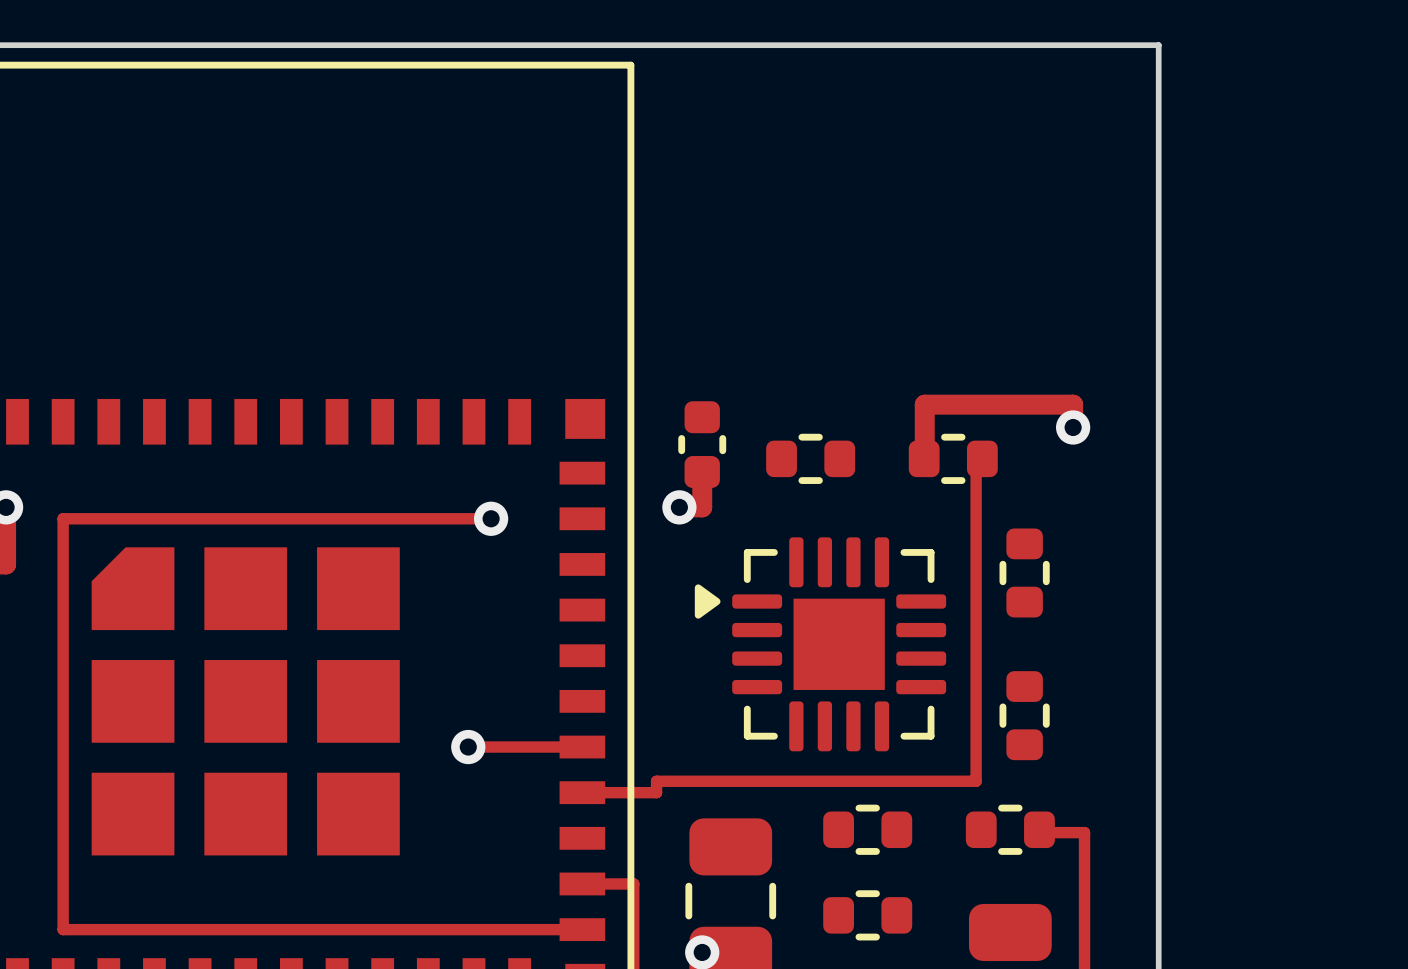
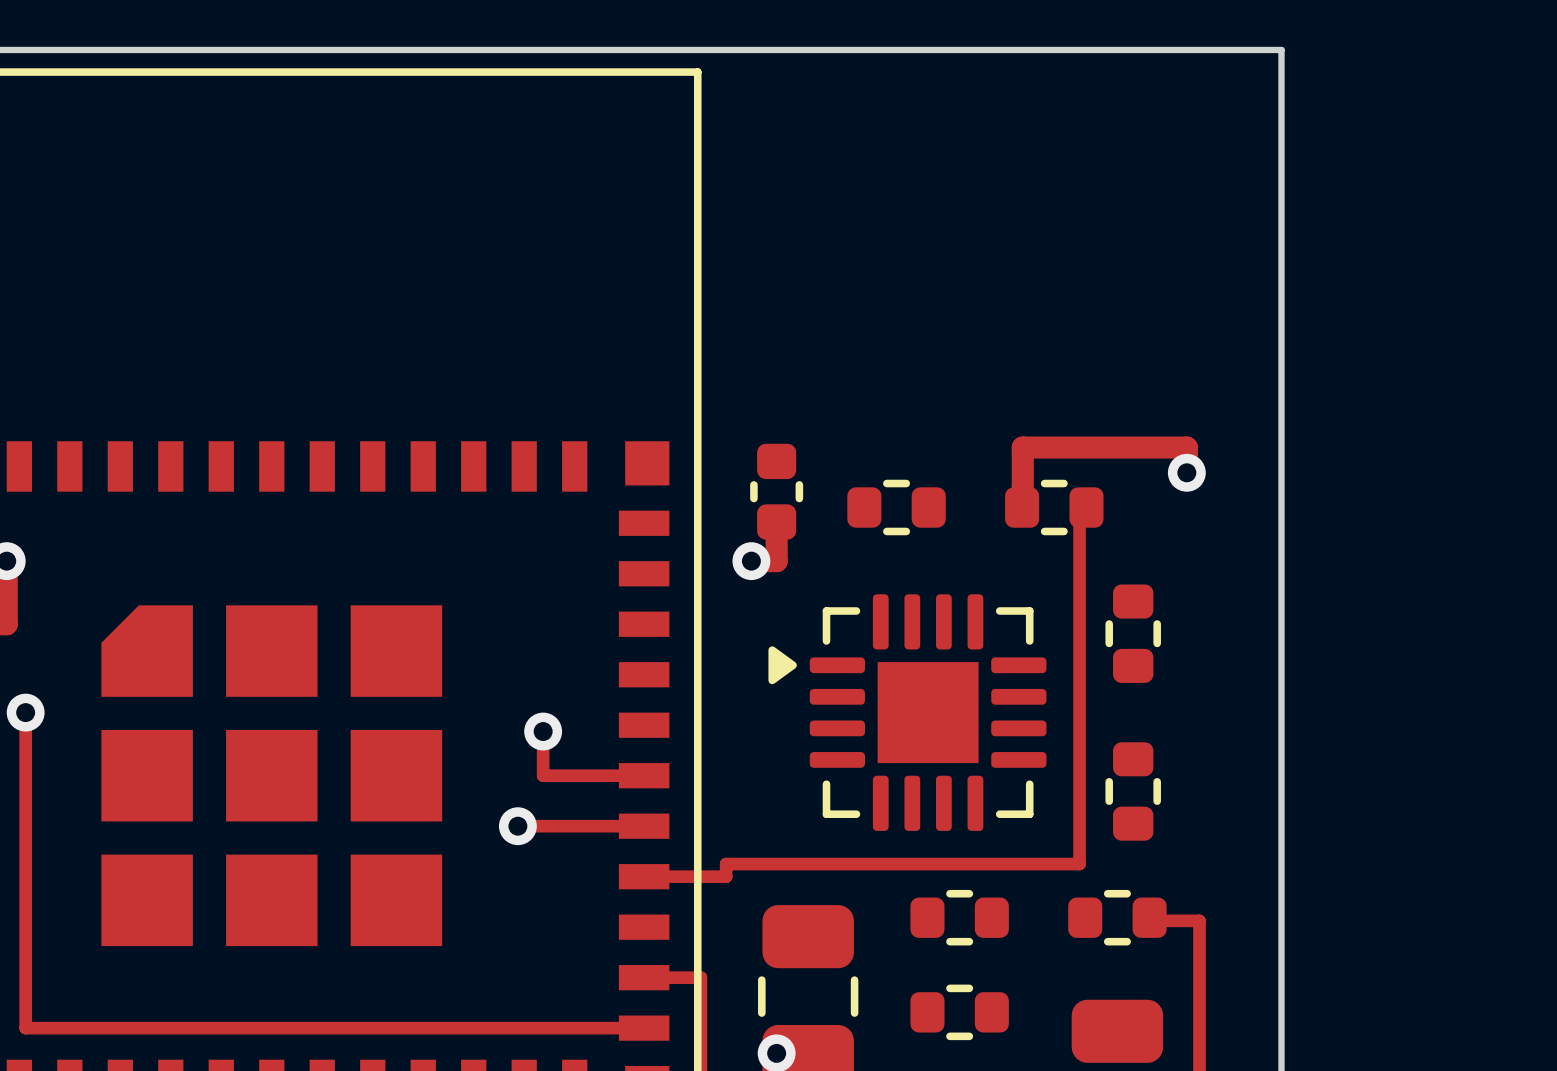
track: (491, 518) (63, 518) (63, 929) -> (25, 712) (25, 1028) (69, 1028)
via position: (491, 518) -> (543, 731)
via: none -> (25, 712)
track: none -> (543, 731) (543, 775) (644, 775)

